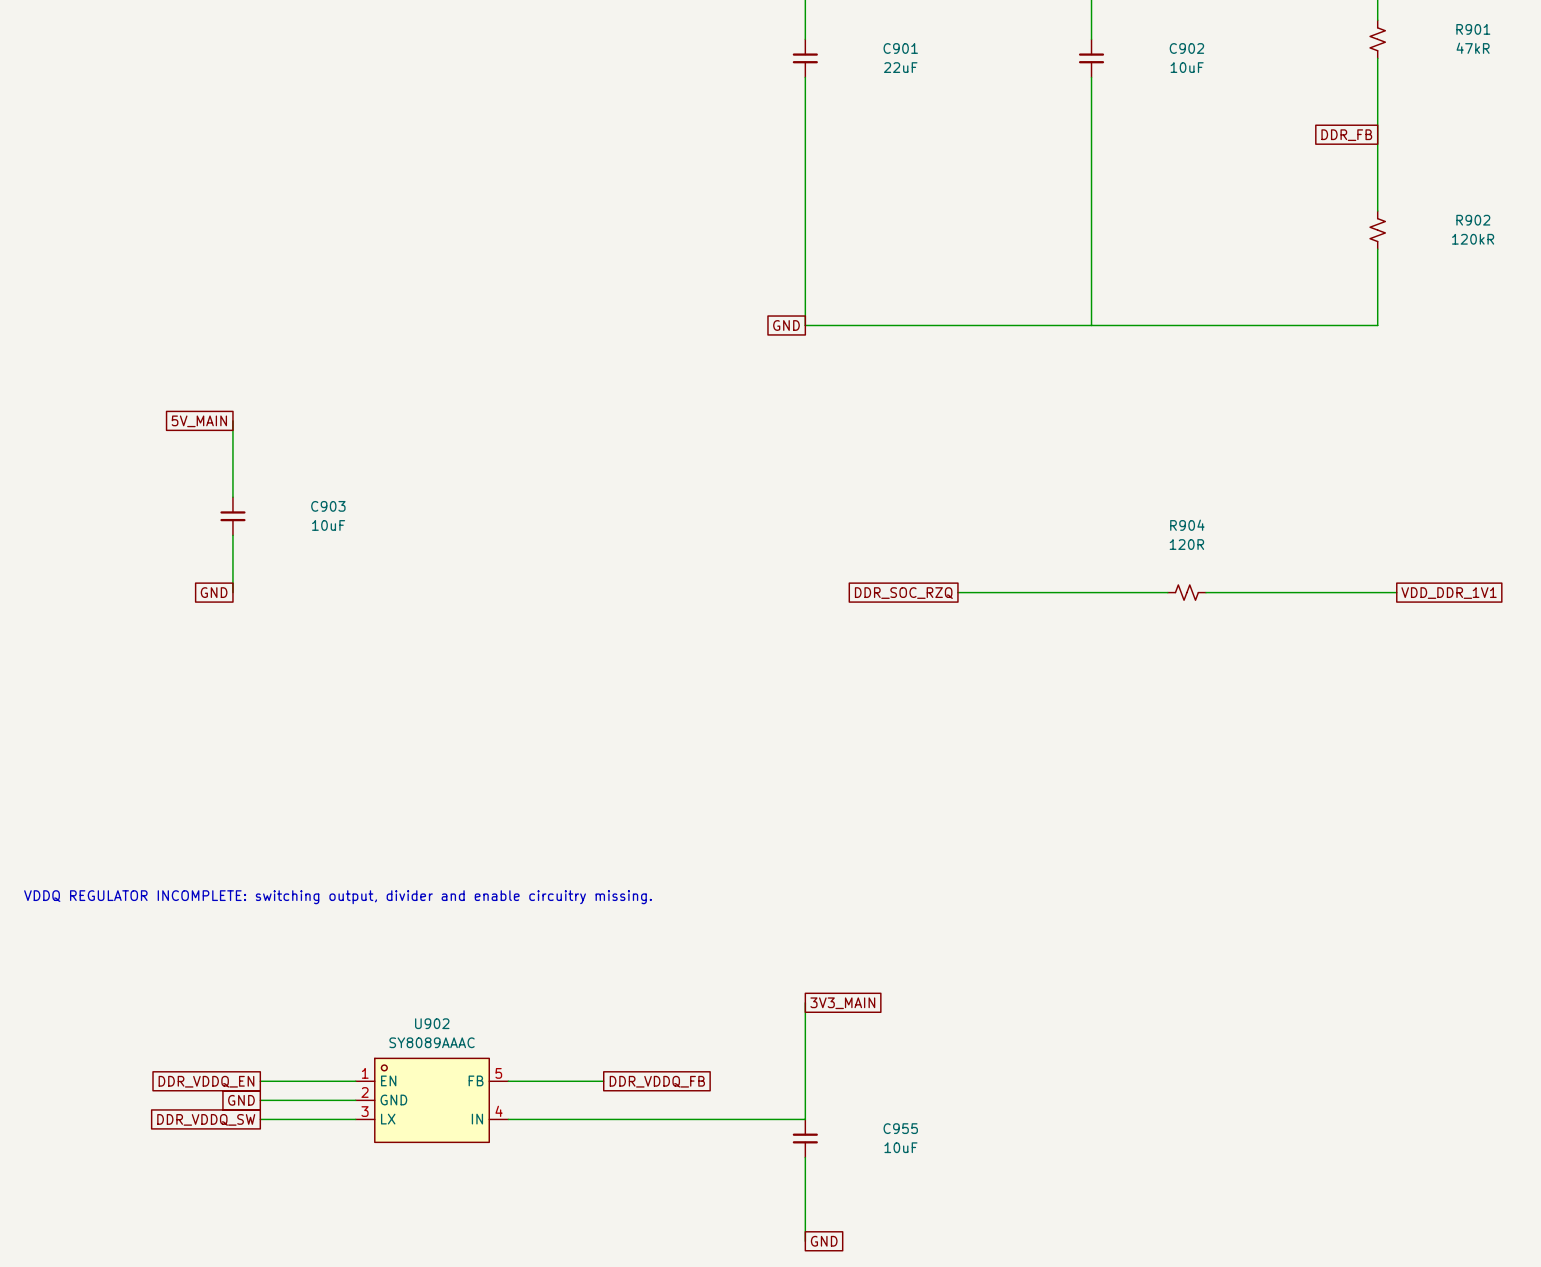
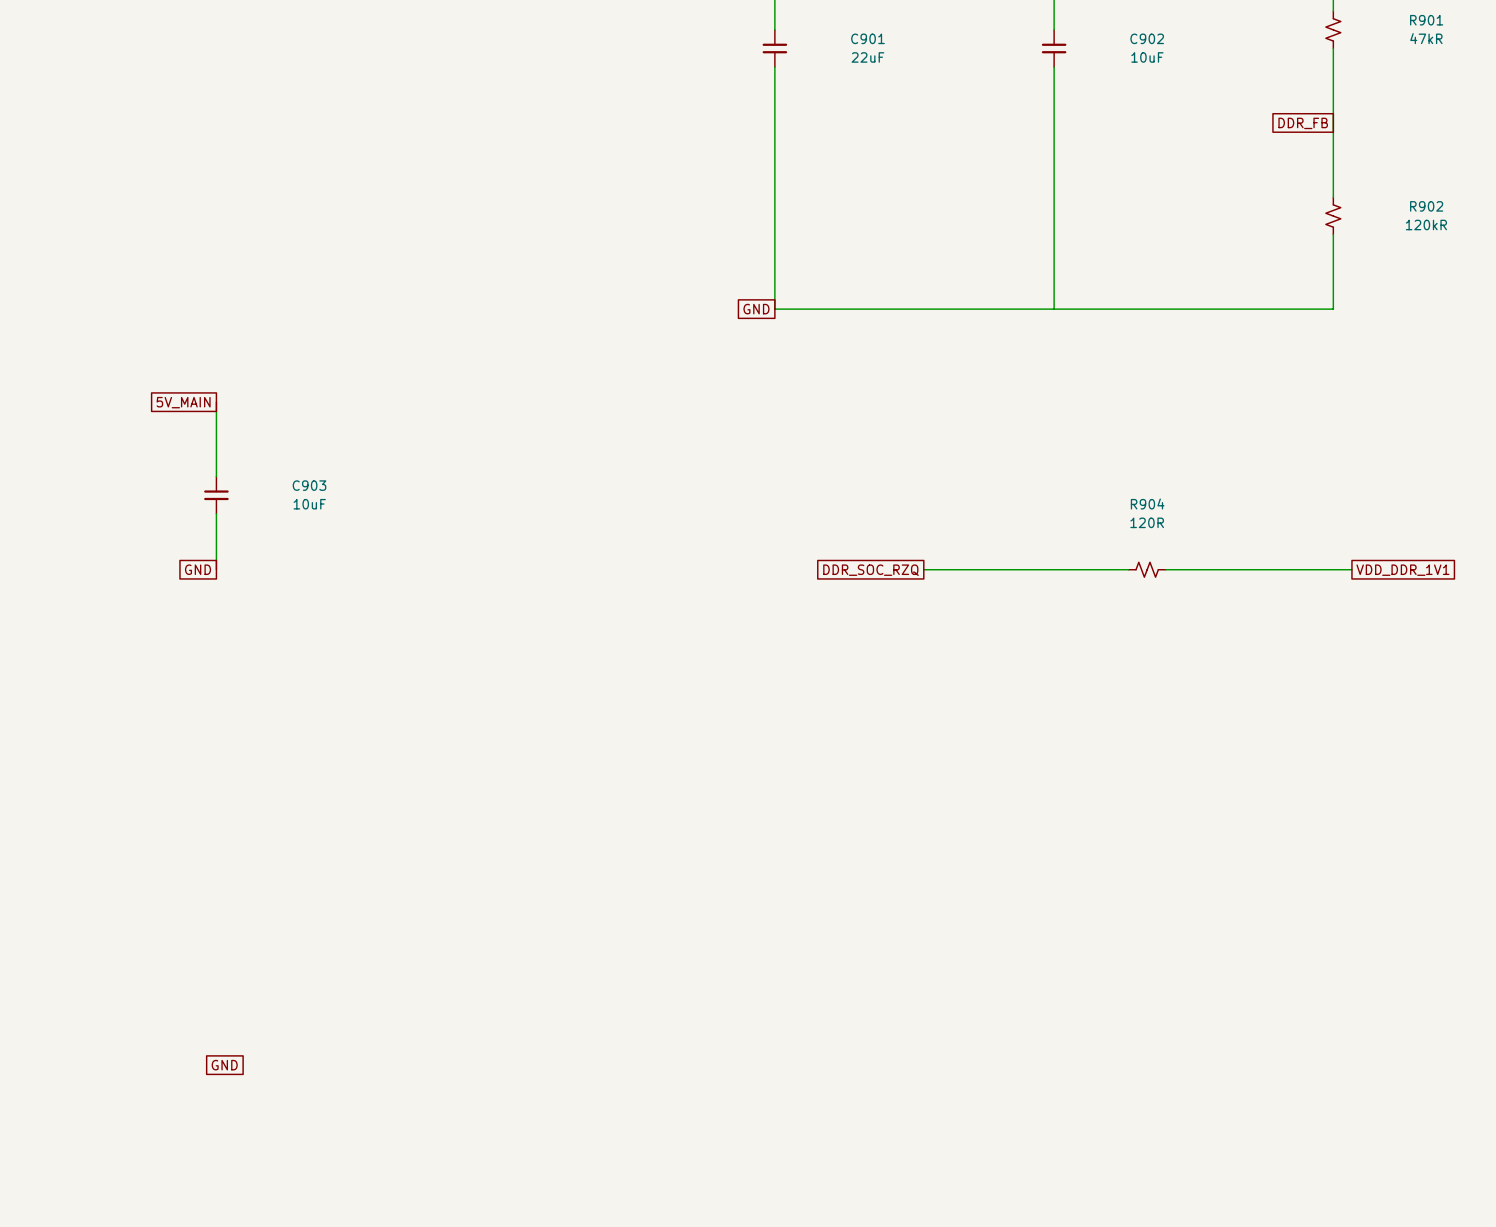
text: VDDQ REGULATOR INCOMPLETE: switching output, divider and enable circuitry missing. (337, 897) -> none
wire: (805, 1002) (805, 1119) (508, 1119) -> none
global label: 3V3_MAIN (842, 1003) -> none
global label: DDR_VDDQ_EN (206, 1081) -> none
wire: (260, 1081) (355, 1081) -> none
wire: (508, 1081) (603, 1081) -> none
global label: DDR_VDDQ_FB (657, 1081) -> none
wire: (260, 1100) (355, 1100) -> none
U902: SY8089AAAC (432, 1100) -> none
global label: DDR_VDDQ_SW (206, 1119) -> none
wire: (260, 1119) (355, 1119) -> none
C955: 10uF (805, 1138) -> none
wire: (805, 1157) (805, 1241) -> none
global label: GND (824, 1241) -> none

